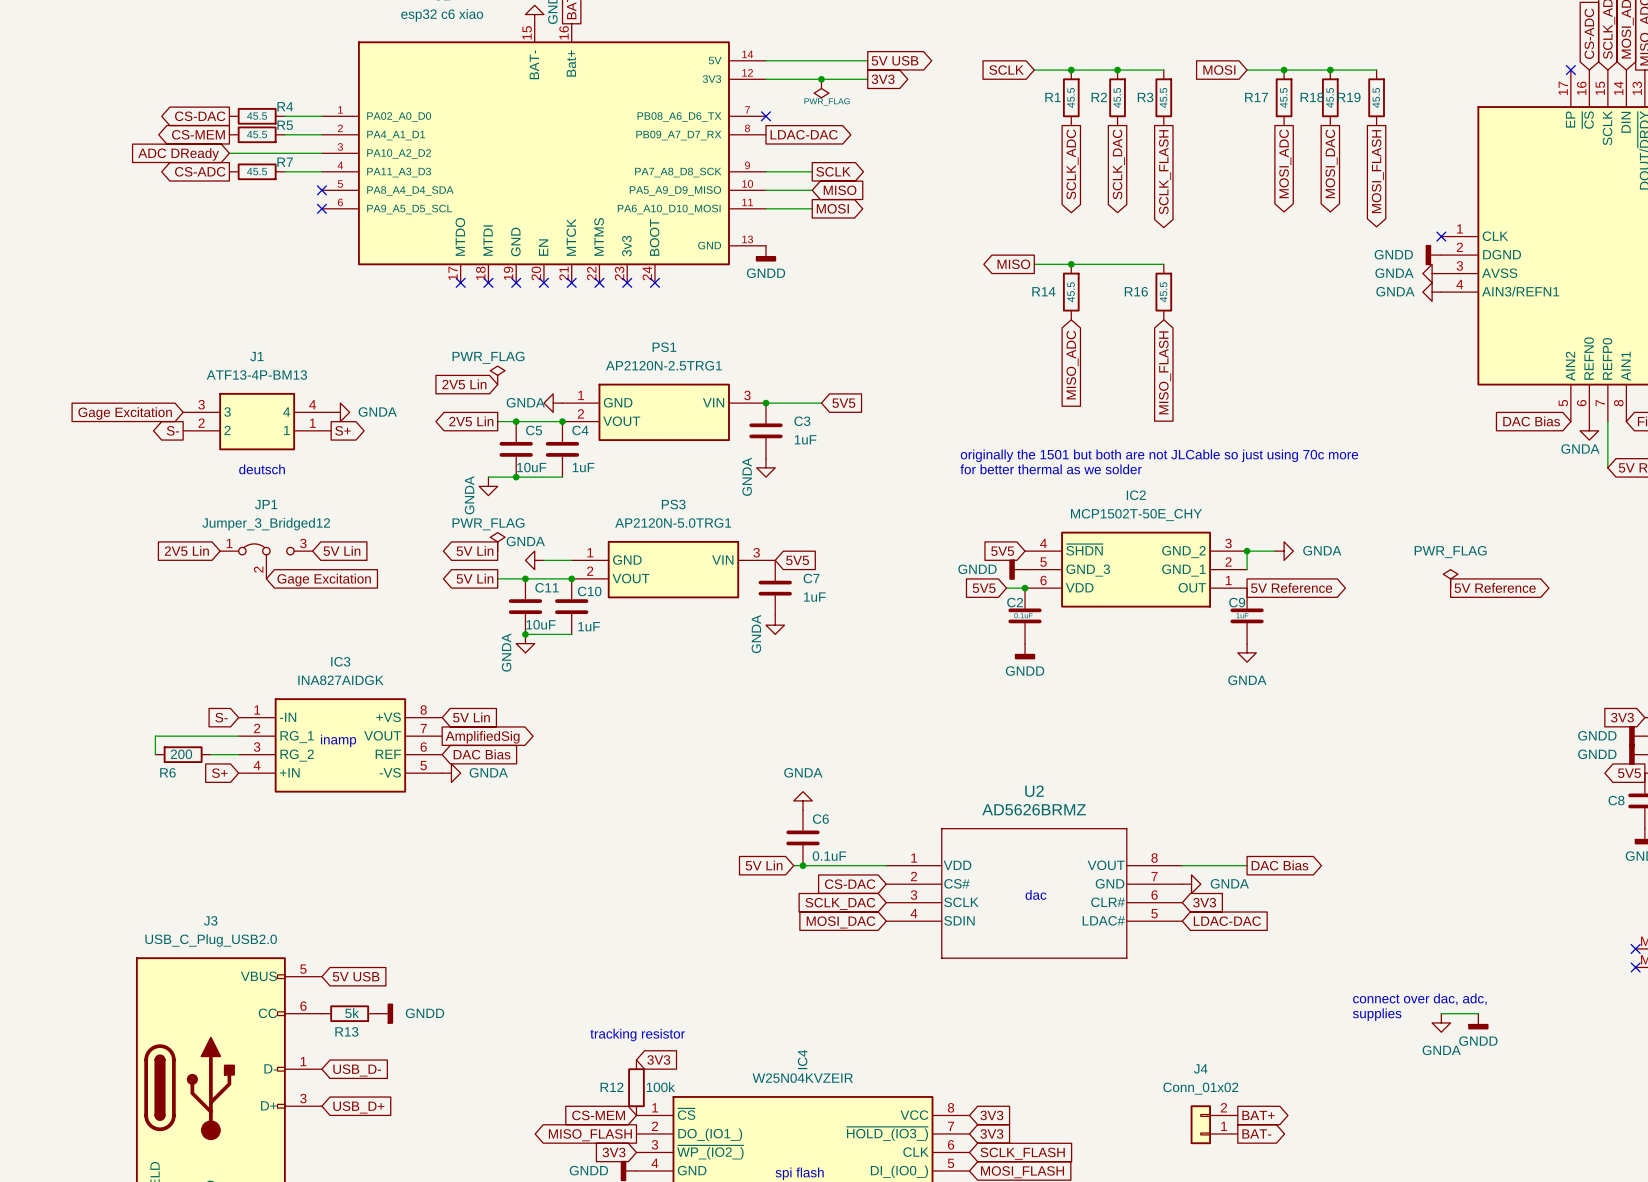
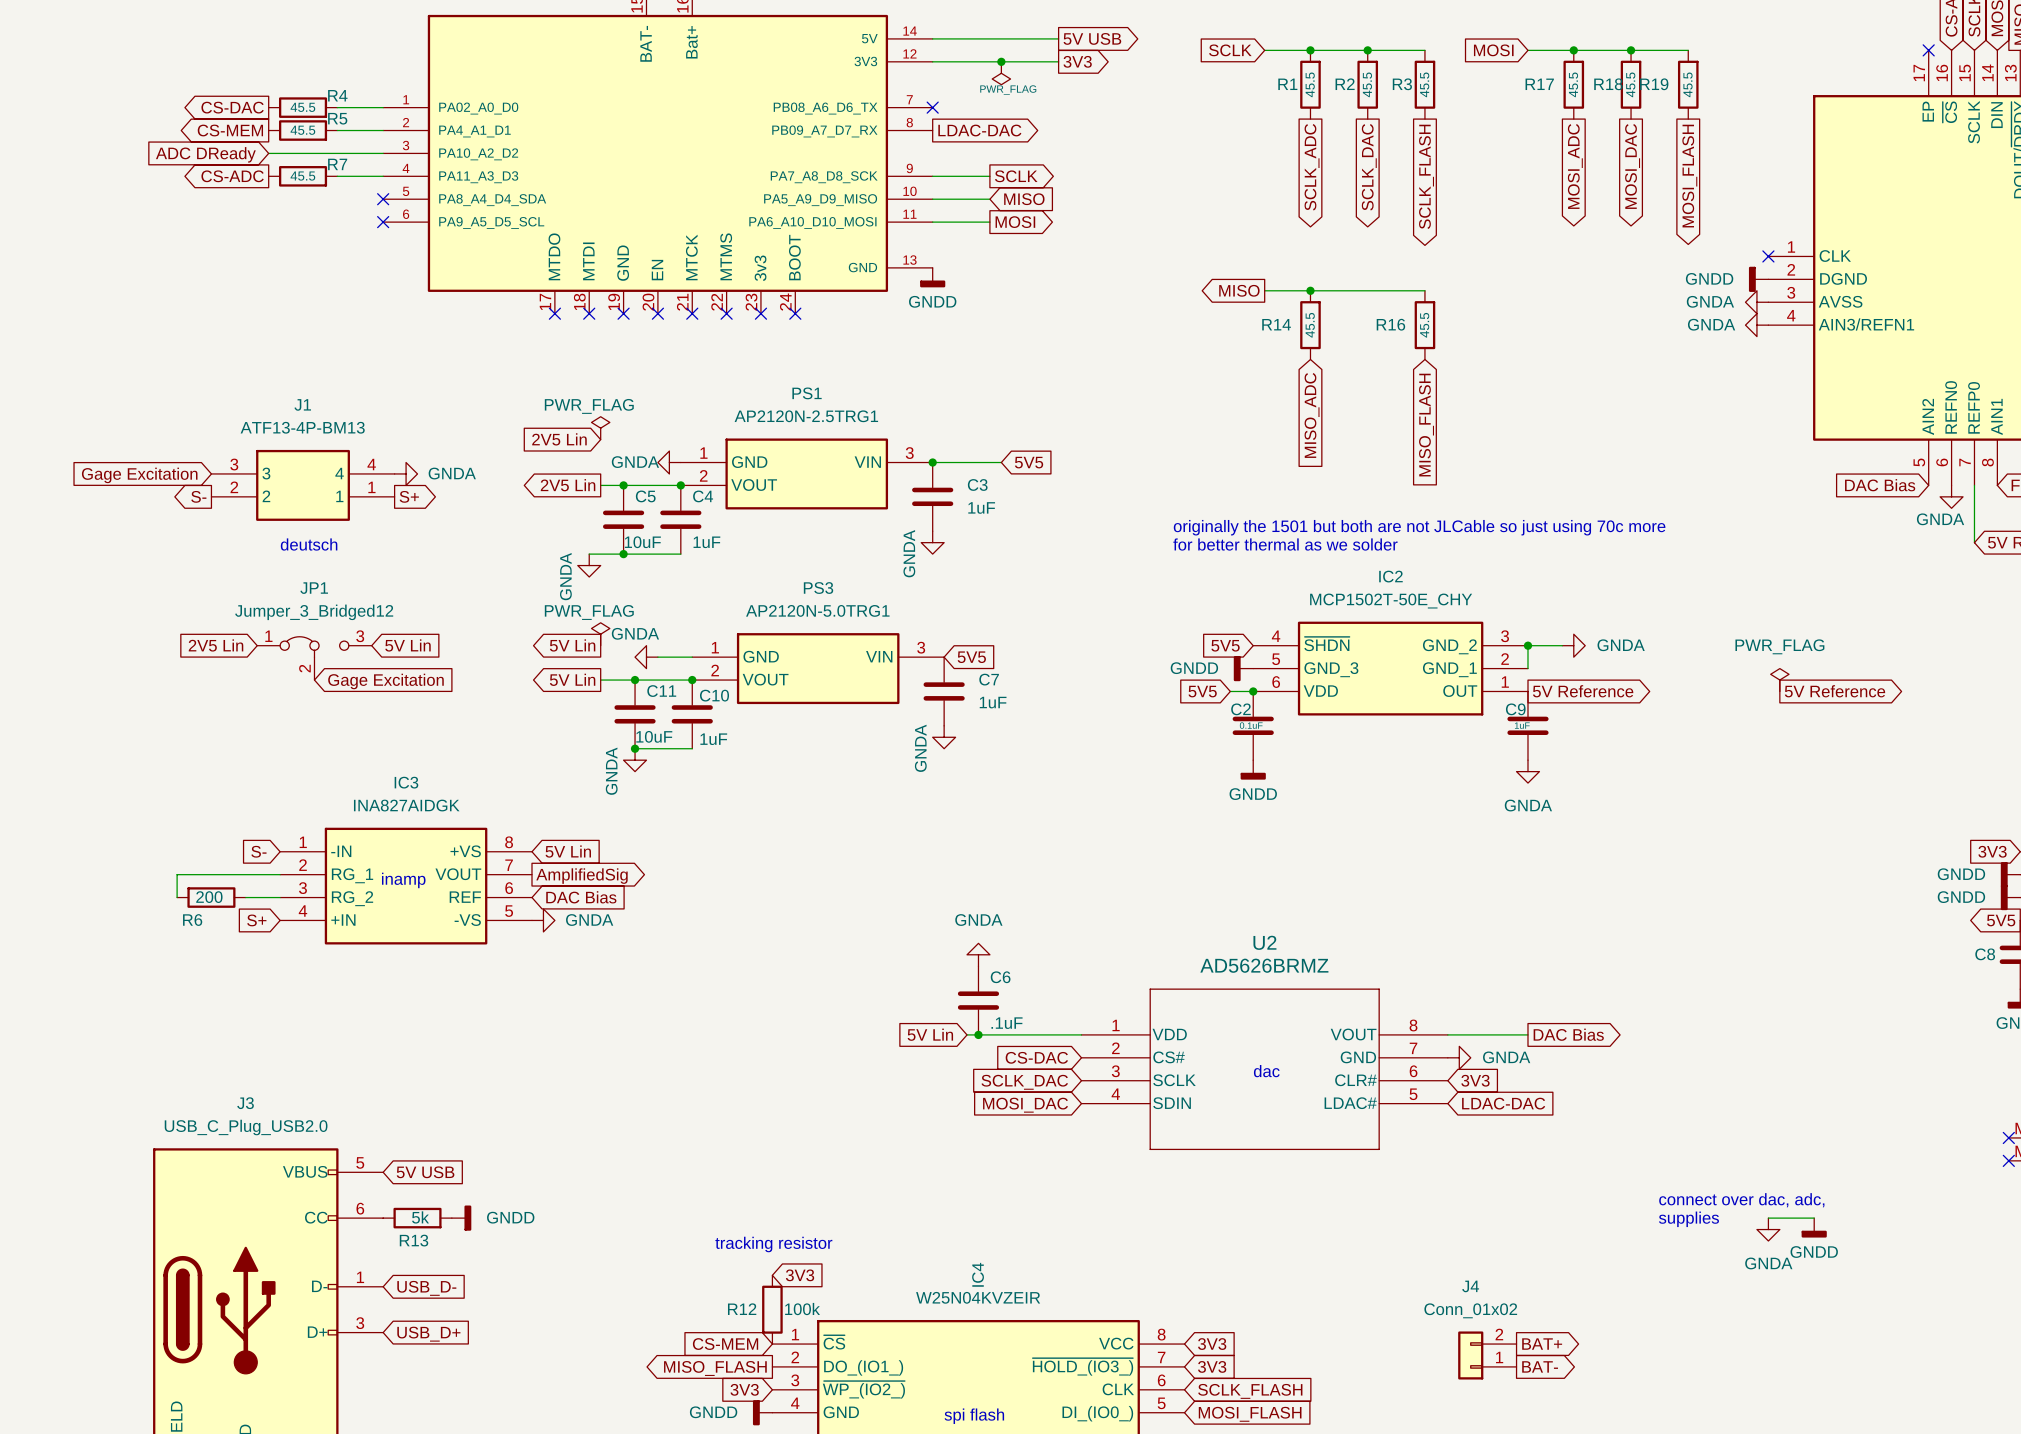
C6 value: 0.1uF (829, 856) -> .1uF (1007, 1023)

